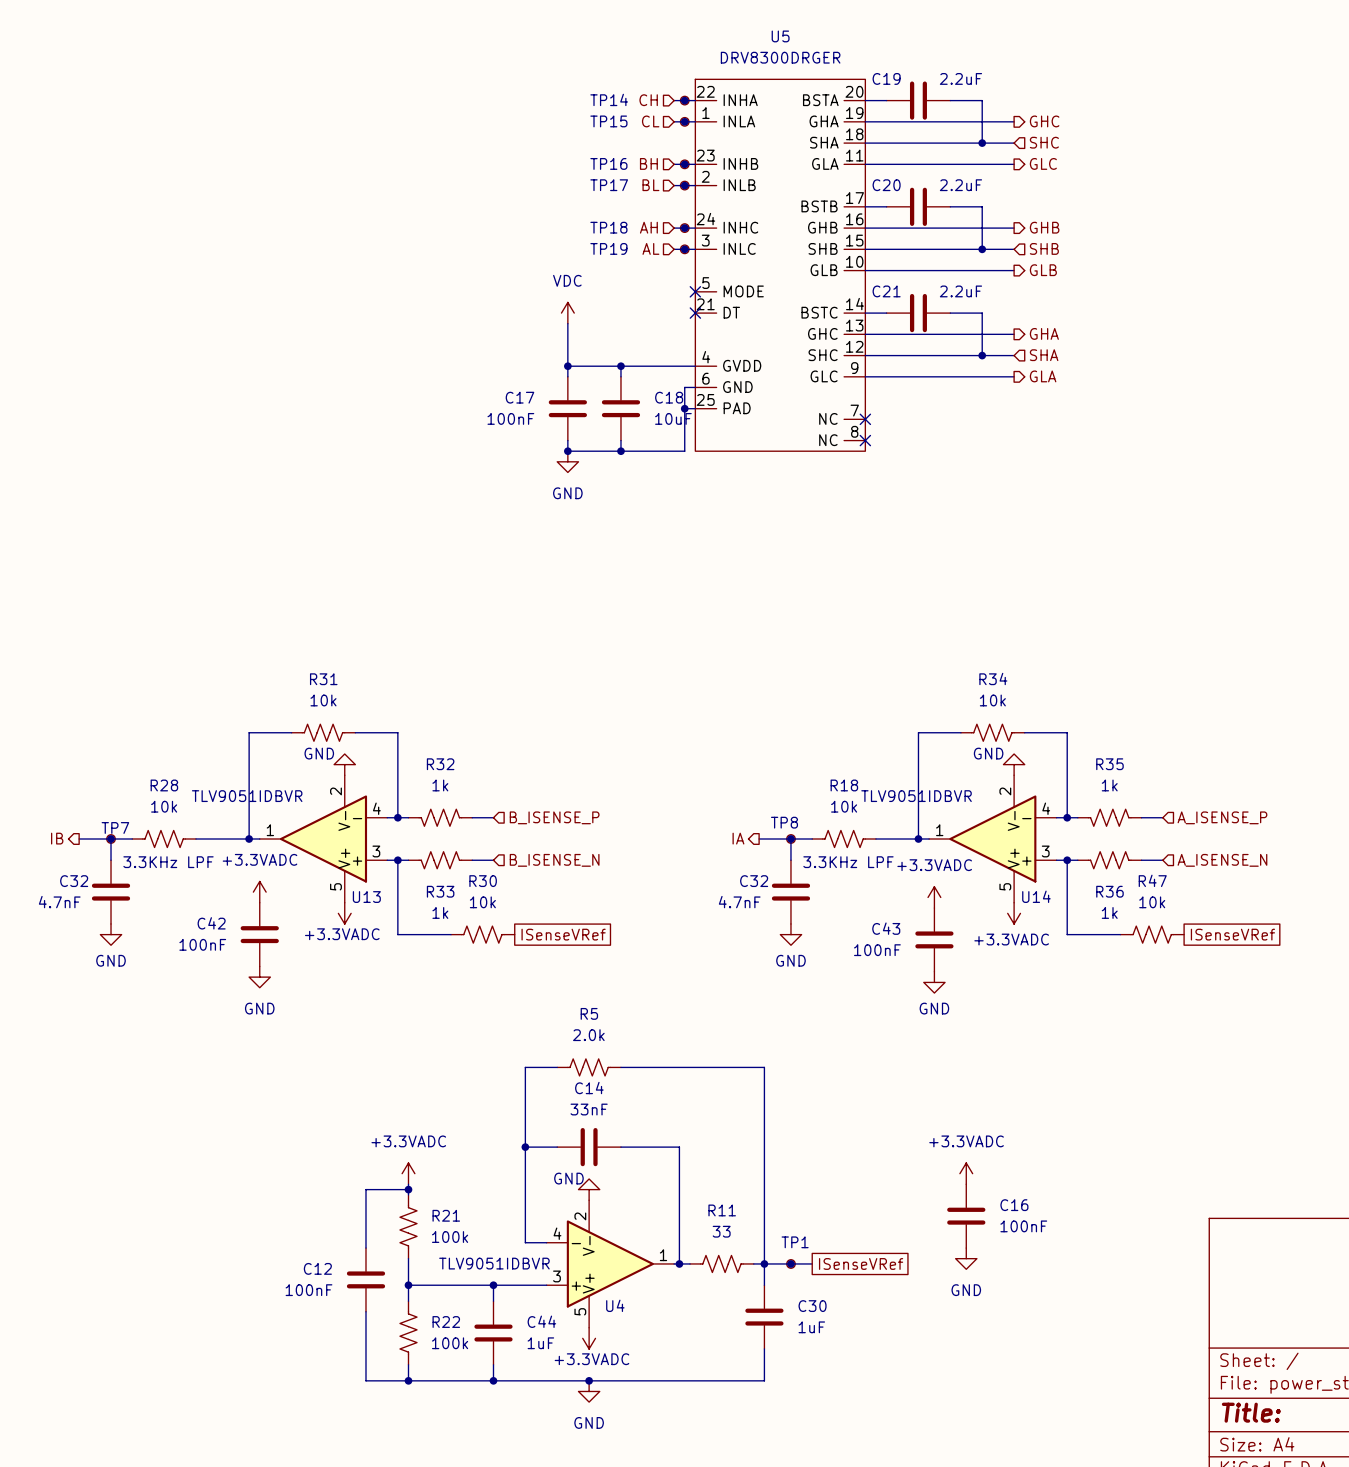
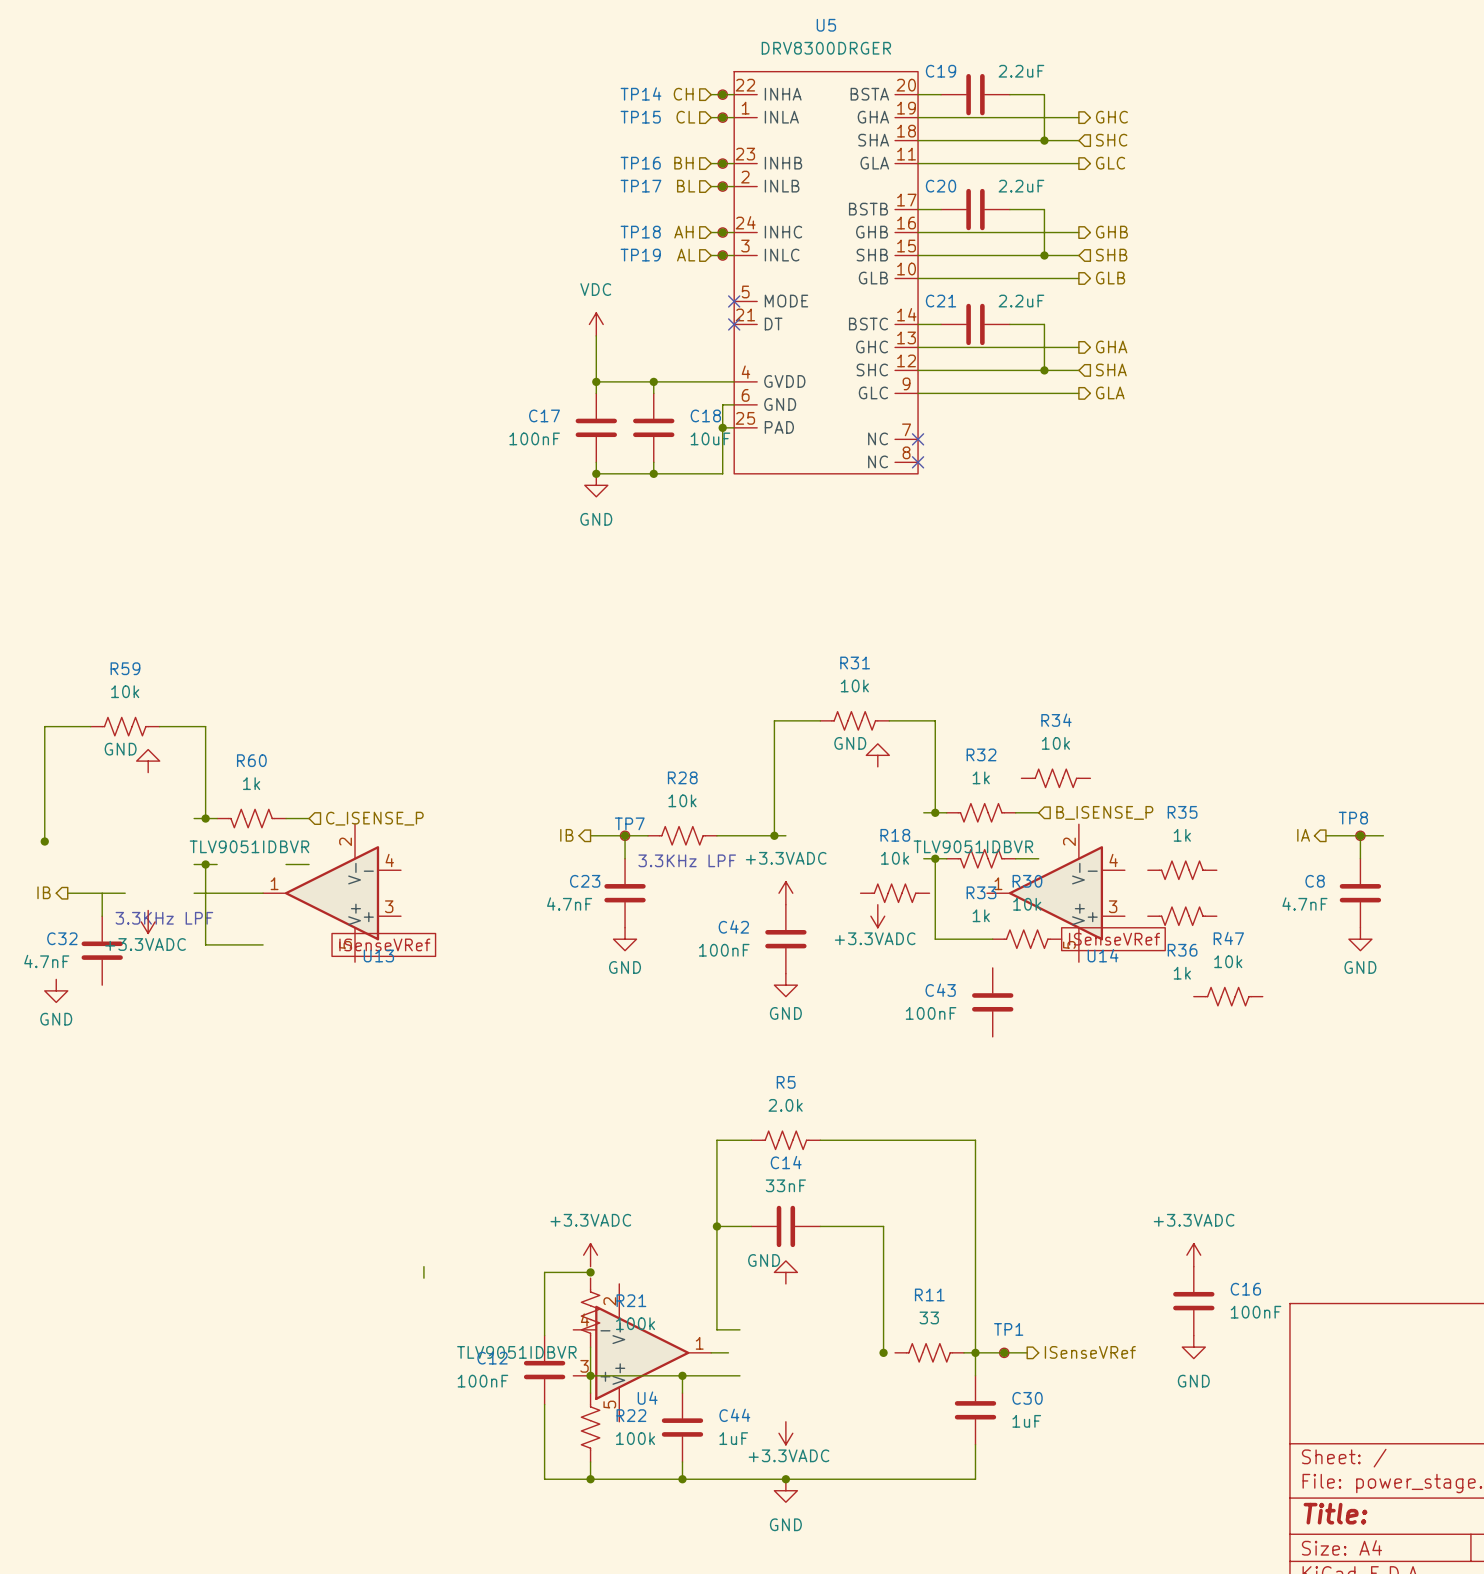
R59: none -> 10k (125, 726)
power symbol: none -> GND (877, 755)
power symbol: none -> GND (148, 761)
wire: (291, 732) (249, 732) (249, 838) -> (90, 726) (44, 726) (44, 841)
R31 position: (323, 732) -> (854, 720)
wire: (355, 732) (397, 732) (397, 817) -> (159, 726) (205, 726) (205, 818)
wire: (960, 732) (918, 732) (918, 838) -> (820, 720) (774, 720) (774, 835)
wire: (1024, 732) (1067, 732) (1067, 817) -> (889, 720) (935, 720) (935, 812)
power symbol: GND (344, 764) -> none
junction: none -> (935, 812)
power symbol: GND (1014, 764) -> none
hierarchical label: none -> B_ISENSE_P (1104, 812)
junction: none -> (205, 818)
R60: none -> 1k (251, 818)
hierarchical label: none -> C_ISENSE_P (374, 818)
hierarchical label: none -> IB (566, 835)
junction: none -> (625, 835)
wire: none -> (716, 835) (785, 835)
junction: none -> (774, 835)
hierarchical label: none -> IA (1303, 835)
wire: none -> (1325, 835) (1383, 835)
wire: none -> (1360, 835) (1360, 858)
junction: none -> (1360, 835)
junction: none -> (44, 841)
junction: none -> (935, 858)
junction: none -> (205, 864)
wire: (387, 817) (408, 817) -> (194, 818) (217, 818)
junction: (397, 817) -> none
R32 position: (440, 817) -> (981, 812)
wire: (472, 817) (493, 817) -> (286, 818) (309, 818)
hierarchical label: B_ISENSE_P (554, 817) -> none
wire: (1056, 817) (1077, 817) -> (923, 812) (946, 812)
junction: (1067, 817) -> none
wire: (1141, 817) (1162, 817) -> (1015, 812) (1038, 812)
hierarchical label: A_ISENSE_P (1222, 817) -> none
junction: (111, 838) -> none
TP7 position: (111, 838) -> (625, 835)
R28 position: (164, 838) -> (682, 835)
junction: (249, 838) -> none
C23: none -> 4.7nF (625, 893)
hierarchical label: IA (738, 838) -> none
power symbol: none -> +3.3VADC (785, 893)
wire: (759, 838) (812, 838) -> (590, 835) (648, 835)
wire: (790, 838) (790, 860) -> (625, 835) (625, 858)
junction: (790, 838) -> none
TP8 position: (790, 838) -> (1360, 835)
wire: (875, 838) (929, 838) -> none
junction: (918, 838) -> none
C8: none -> 4.7nF (1360, 893)
wire: (387, 860) (408, 860) -> (194, 864) (217, 864)
wire: (397, 860) (397, 934) (450, 934) -> (205, 864) (205, 944) (263, 944)
junction: (397, 860) -> none
R33 position: (440, 860) -> (981, 858)
wire: (472, 860) (493, 860) -> (286, 864) (309, 864)
hierarchical label: B_ISENSE_N (554, 860) -> none
power symbol: none -> +3.3VADC (877, 916)
wire: (1056, 860) (1077, 860) -> (923, 858) (946, 858)
wire: (1067, 860) (1067, 934) (1120, 934) -> (935, 858) (935, 939) (992, 939)
junction: (1067, 860) -> none
wire: (1141, 860) (1162, 860) -> (1015, 858) (1038, 858)
hierarchical label: A_ISENSE_N (1222, 860) -> none
text position: 3.3KHz LPF (848, 862) -> 3.3KHz LPF (687, 860)
power symbol: none -> +3.3VADC (148, 921)
power symbol: none -> GND (625, 939)
power symbol: none -> GND (1360, 939)
power symbol: +3.3VADC (259, 892) -> none
C32: 4.7nF (790, 892) -> none
power symbol: +3.3VADC (934, 897) -> none
power symbol: +3.3VADC (344, 913) -> none
power symbol: +3.3VADC (1014, 913) -> none
power symbol position: GND (111, 934) -> GND (56, 990)
C42 position: (259, 934) -> (785, 939)
R30 position: (482, 934) -> (1027, 939)
global label position: ISenseVRef (563, 934) -> ISenseVRef (384, 944)
power symbol position: GND (790, 934) -> GND (785, 985)
global label position: ISenseVRef (1232, 934) -> ISenseVRef (1114, 939)
power symbol: GND (259, 977) -> none
power symbol: GND (934, 982) -> none
wire: (557, 1067) (525, 1067) (525, 1242) (546, 1242) -> none
R5 position: (589, 1067) -> (785, 1140)
wire: (620, 1067) (679, 1067) -> (751, 1226) (716, 1226) (716, 1140)
wire: (711, 1067) (764, 1067) (764, 1285) -> none
wire: none -> (820, 1140) (975, 1140) (975, 1375)
wire: (525, 1147) (557, 1147) -> none
junction: (525, 1147) -> none
C14 position: (589, 1147) -> (785, 1226)
wire: (620, 1147) (679, 1147) -> none
junction: none -> (716, 1226)
wire: none -> (820, 1226) (883, 1226) (883, 1352)
power symbol: +3.3VADC (408, 1173) -> none
power symbol: none -> +3.3VADC (590, 1255)
power symbol: +3.3VADC (966, 1173) -> none
power symbol: none -> +3.3VADC (1193, 1255)
wire: (408, 1189) (365, 1189) (365, 1248) -> (590, 1272) (544, 1272) (544, 1335)
junction: (408, 1189) -> none
junction: none -> (590, 1272)
power symbol: GND (589, 1189) -> none
power symbol: none -> GND (785, 1272)
C16 position: (966, 1216) -> (1193, 1301)
R21 position: (408, 1226) -> (590, 1312)
wire: (679, 1242) (679, 1263) -> (716, 1329) (739, 1329)
wire: (408, 1258) (408, 1301) -> (590, 1347) (590, 1393)
power symbol: GND (966, 1258) -> none
power symbol: none -> GND (1193, 1347)
junction position: (679, 1263) -> (682, 1375)
R11 position: (721, 1263) -> (929, 1352)
wire: (753, 1263) (812, 1263) -> (964, 1352) (1027, 1352)
junction: (764, 1263) -> none
junction: (790, 1263) -> none
TP1 position: (790, 1263) -> (1004, 1352)
junction: none -> (883, 1352)
global label: ISenseVRef (861, 1263) -> none
junction: none -> (975, 1352)
junction: none -> (1004, 1352)
hierarchical label: none -> ISenseVRef (1090, 1352)
C12 position: (365, 1279) -> (544, 1370)
wire: (408, 1285) (546, 1285) -> (590, 1375) (739, 1375)
junction: (408, 1285) -> none
wire: (493, 1285) (493, 1301) -> (682, 1375) (682, 1393)
junction: (493, 1285) -> none
junction: none -> (590, 1375)
wire: (365, 1311) (365, 1380) (520, 1380) -> (544, 1404) (544, 1479)
C30 position: (764, 1317) -> (975, 1410)
R22 position: (408, 1333) -> (590, 1427)
C44 position: (493, 1333) -> (682, 1427)
power symbol: +3.3VADC (589, 1338) -> none
power symbol: none -> +3.3VADC (785, 1433)
wire: (764, 1348) (764, 1380) -> (975, 1444) (975, 1479) (808, 1479)
wire: (408, 1364) (408, 1380) -> (590, 1462) (590, 1479)
wire: (493, 1364) (493, 1380) -> (682, 1462) (682, 1479)
junction: (408, 1380) -> none
junction: (493, 1380) -> none
junction position: (589, 1380) -> (590, 1479)
junction: none -> (682, 1479)
junction: none -> (785, 1479)
power symbol: GND (589, 1391) -> none
power symbol: none -> GND (785, 1490)

